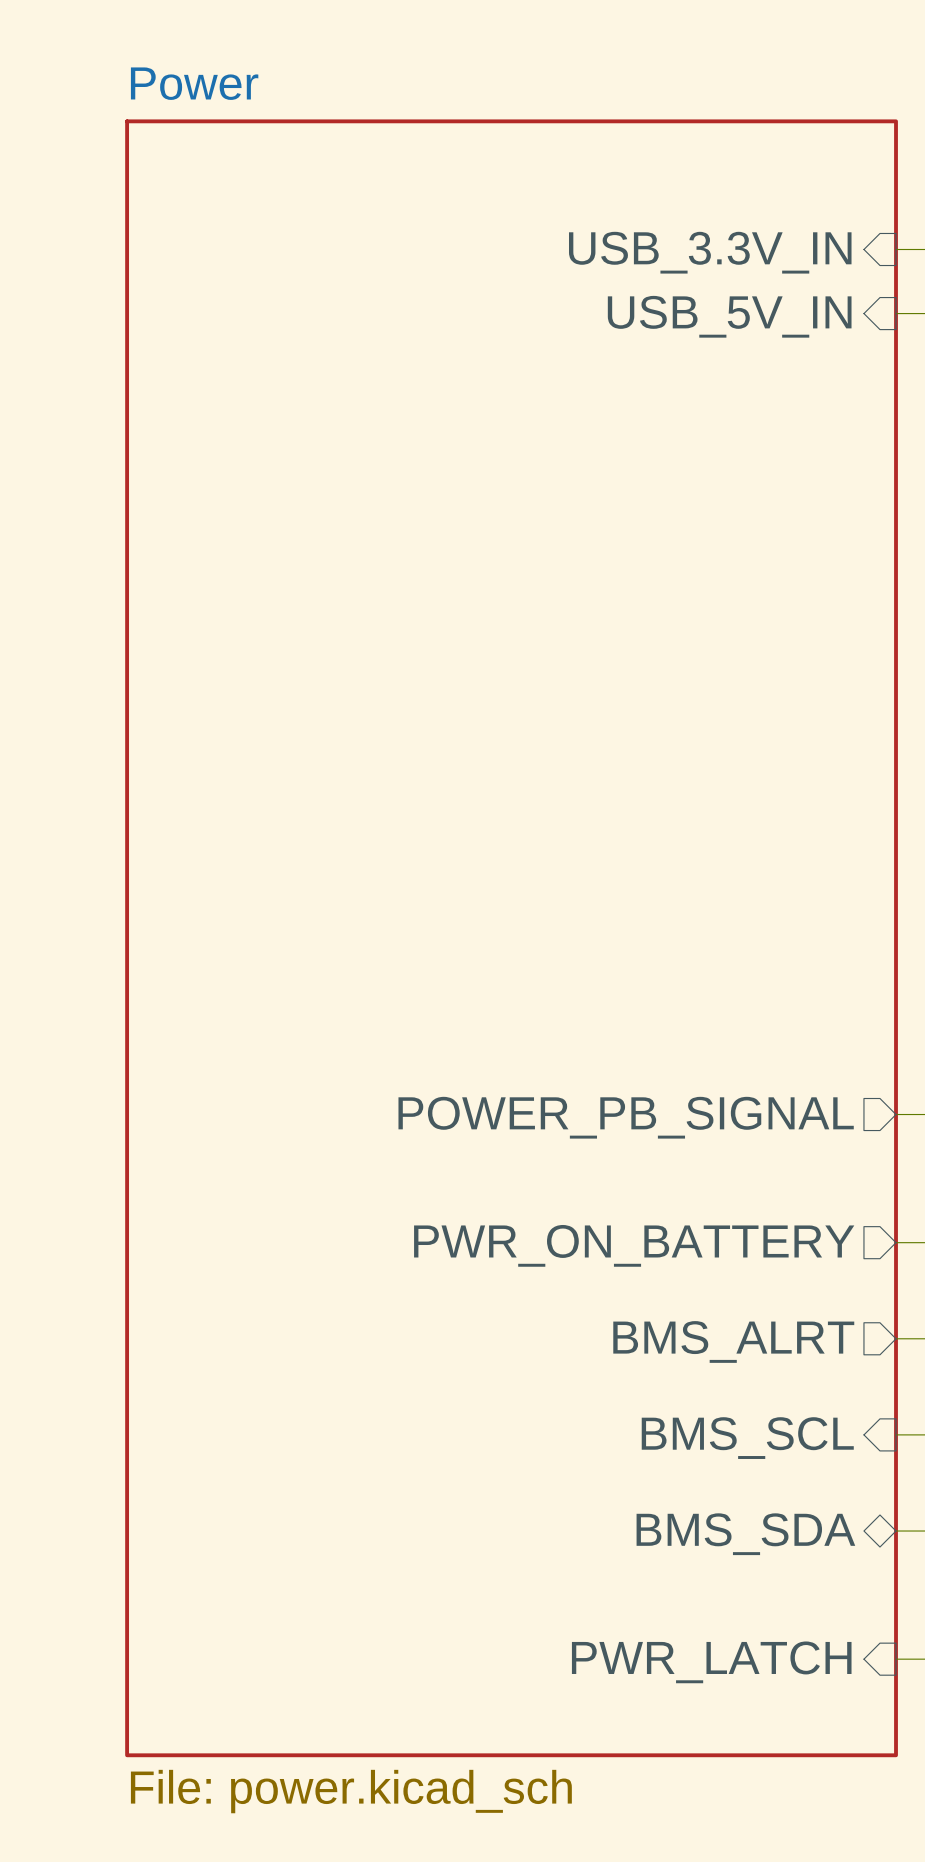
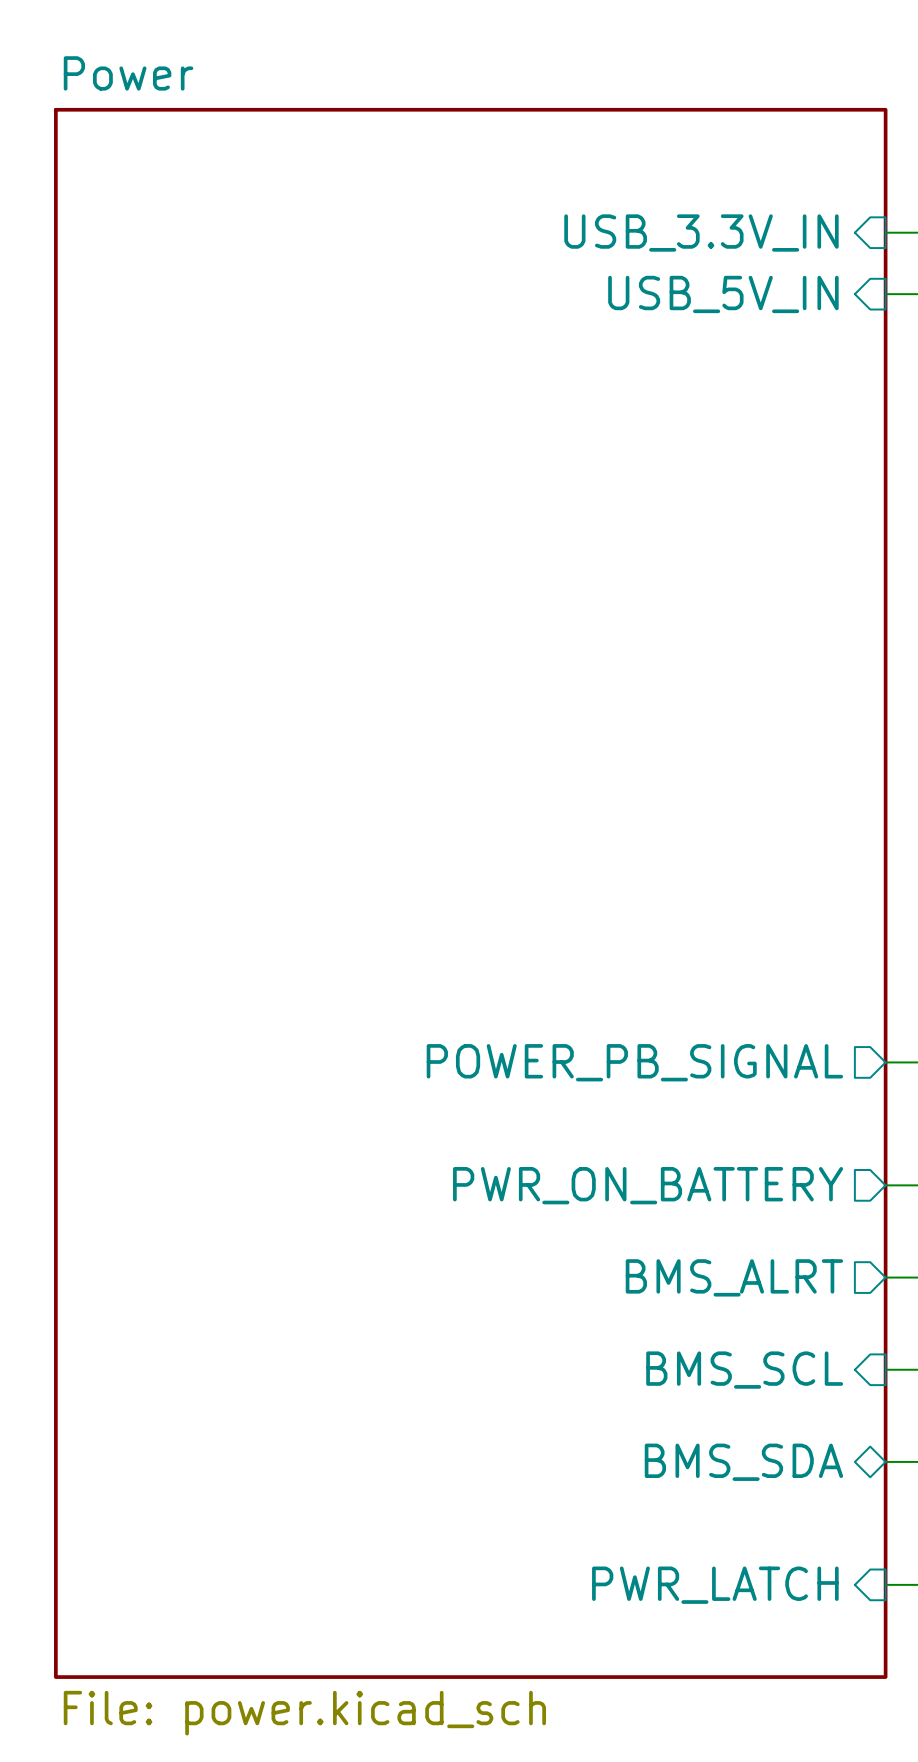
sheet Power: none -> File: power.kicad_sch (470, 893)
sheet Power: File: power.kicad_sch (511, 938) -> none

